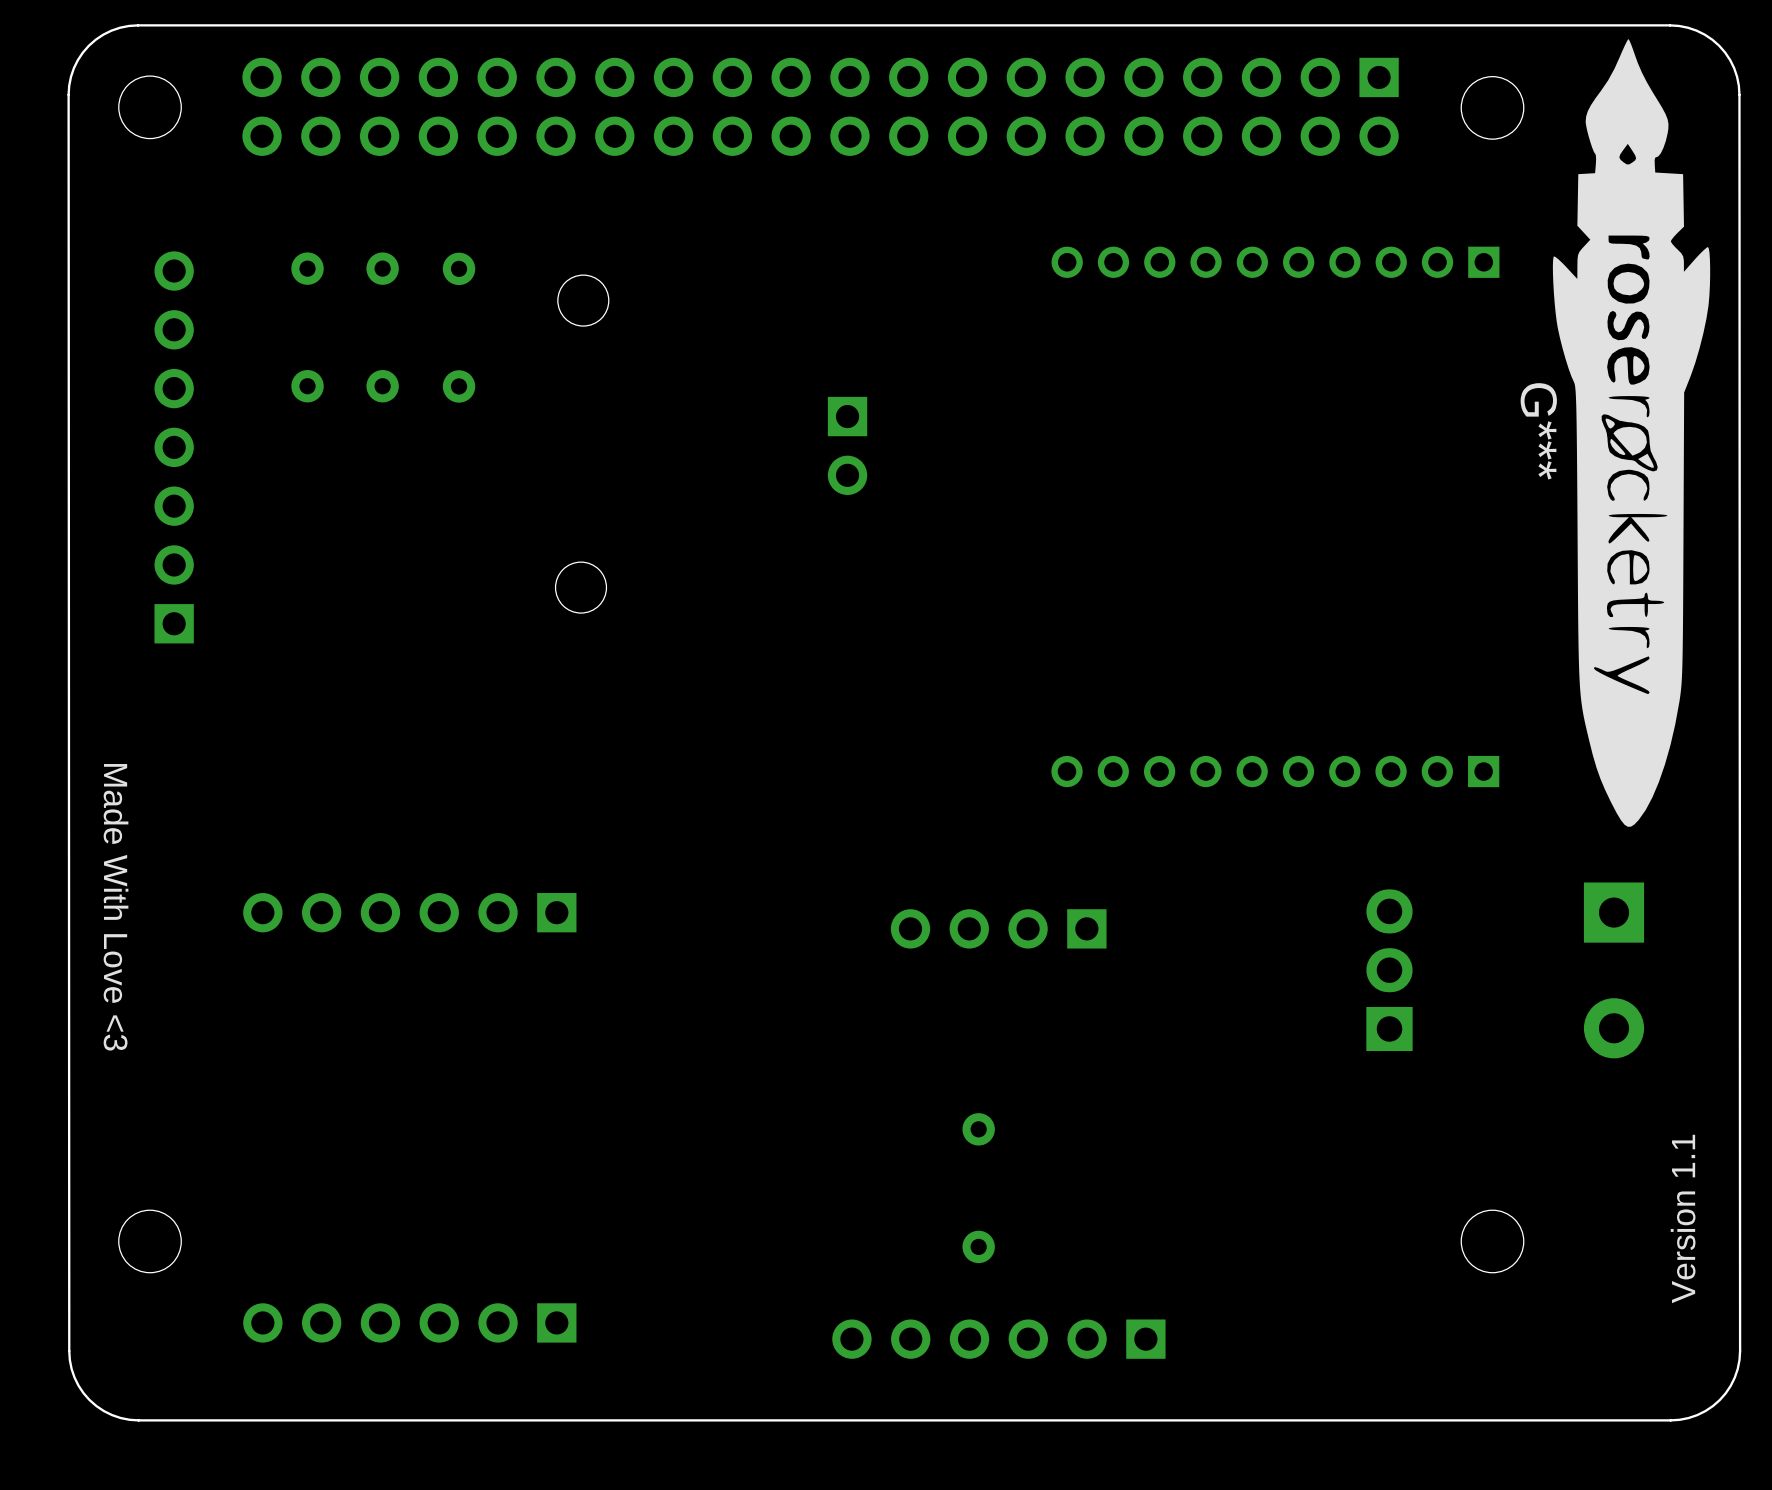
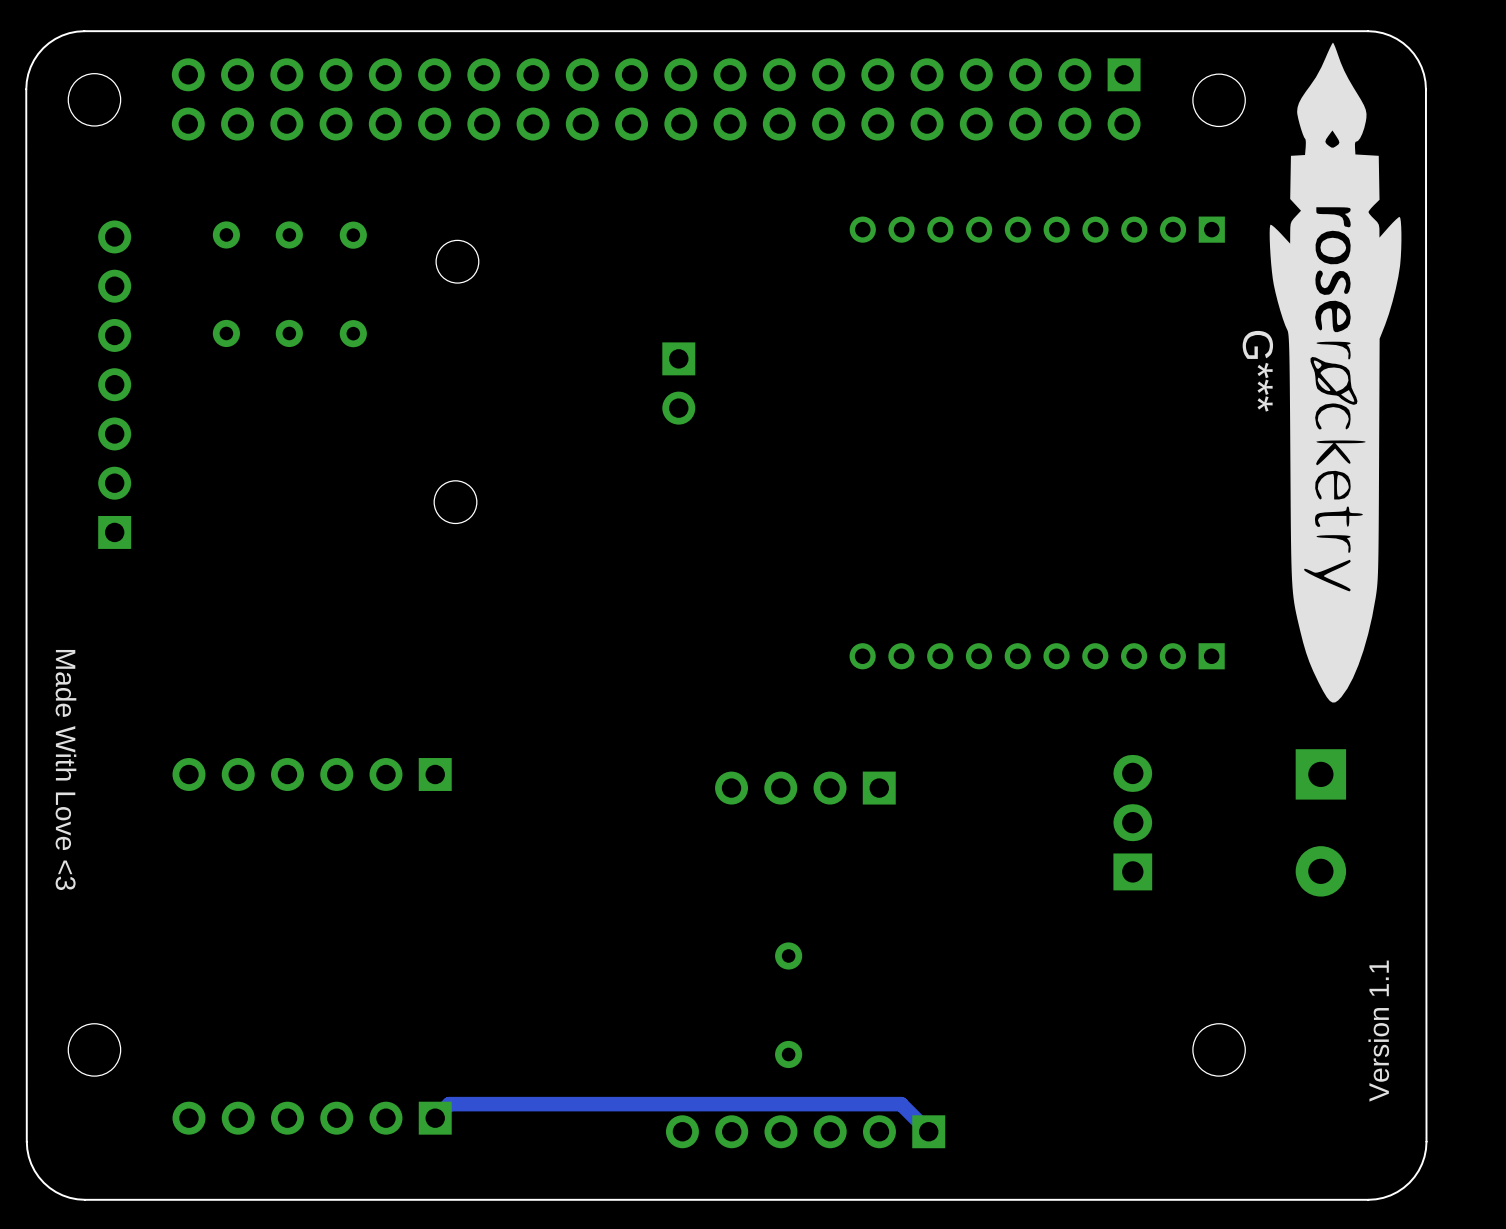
track: none -> (435, 1118) (449, 1104) (901, 1104) (928, 1131)

